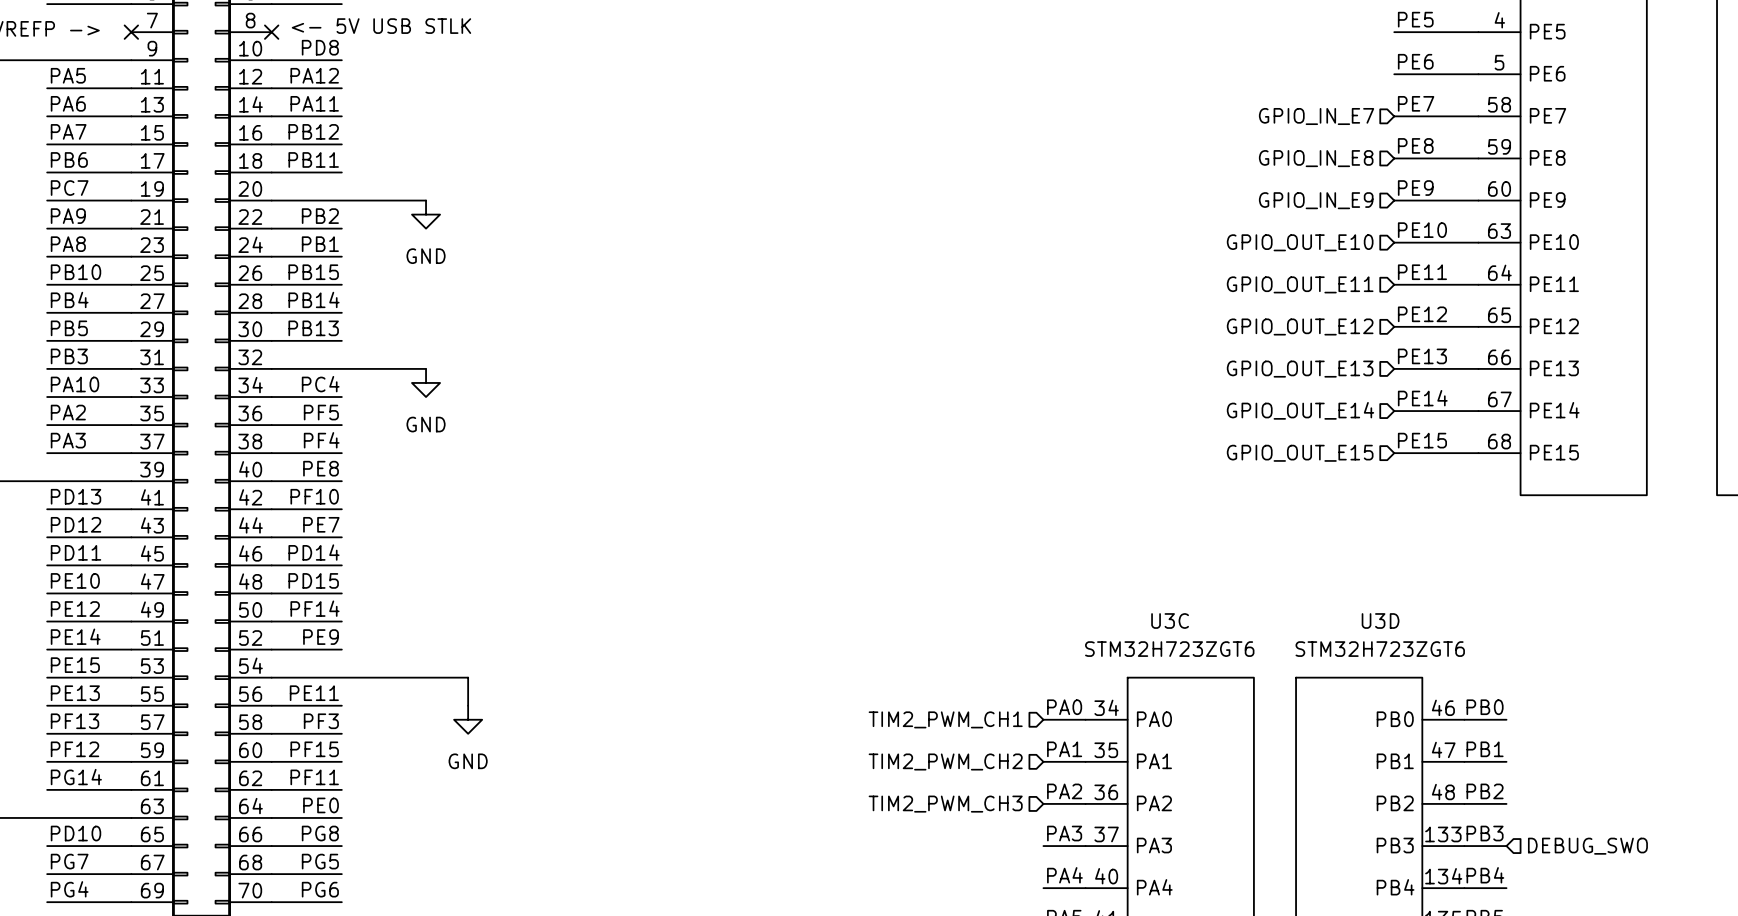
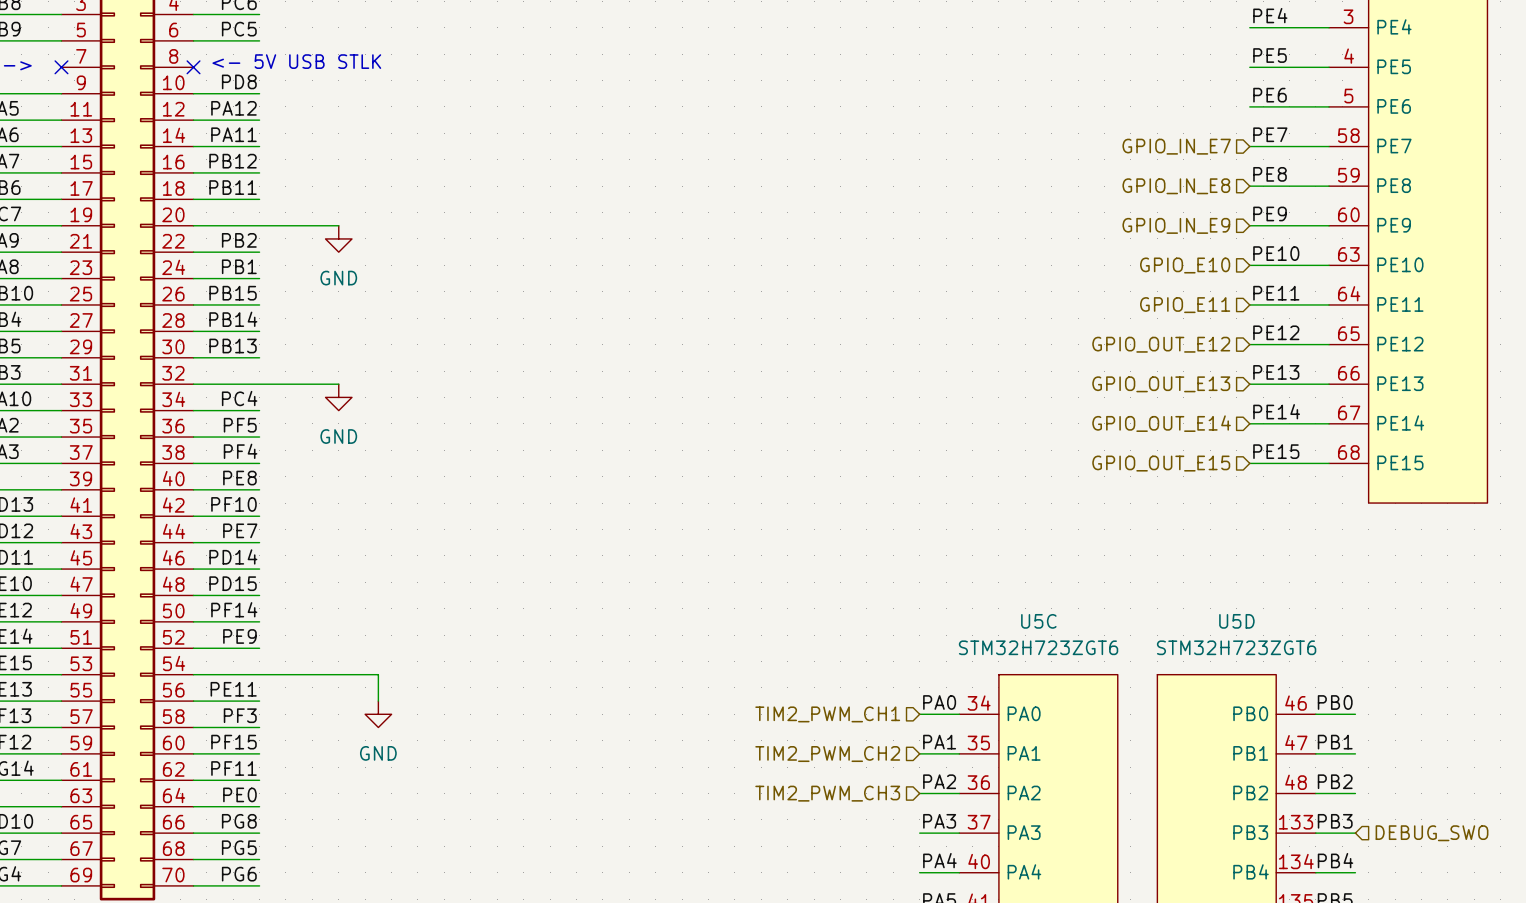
hierarchical label: GPIO_OUT_E10 (1300, 242) -> GPIO_E10 (1185, 265)
hierarchical label: GPIO_OUT_E11 (1300, 284) -> GPIO_E11 (1185, 305)
U3C name: U3C (1170, 621) -> U5C (1038, 621)
U3D name: U3D (1380, 621) -> U5D (1236, 621)

